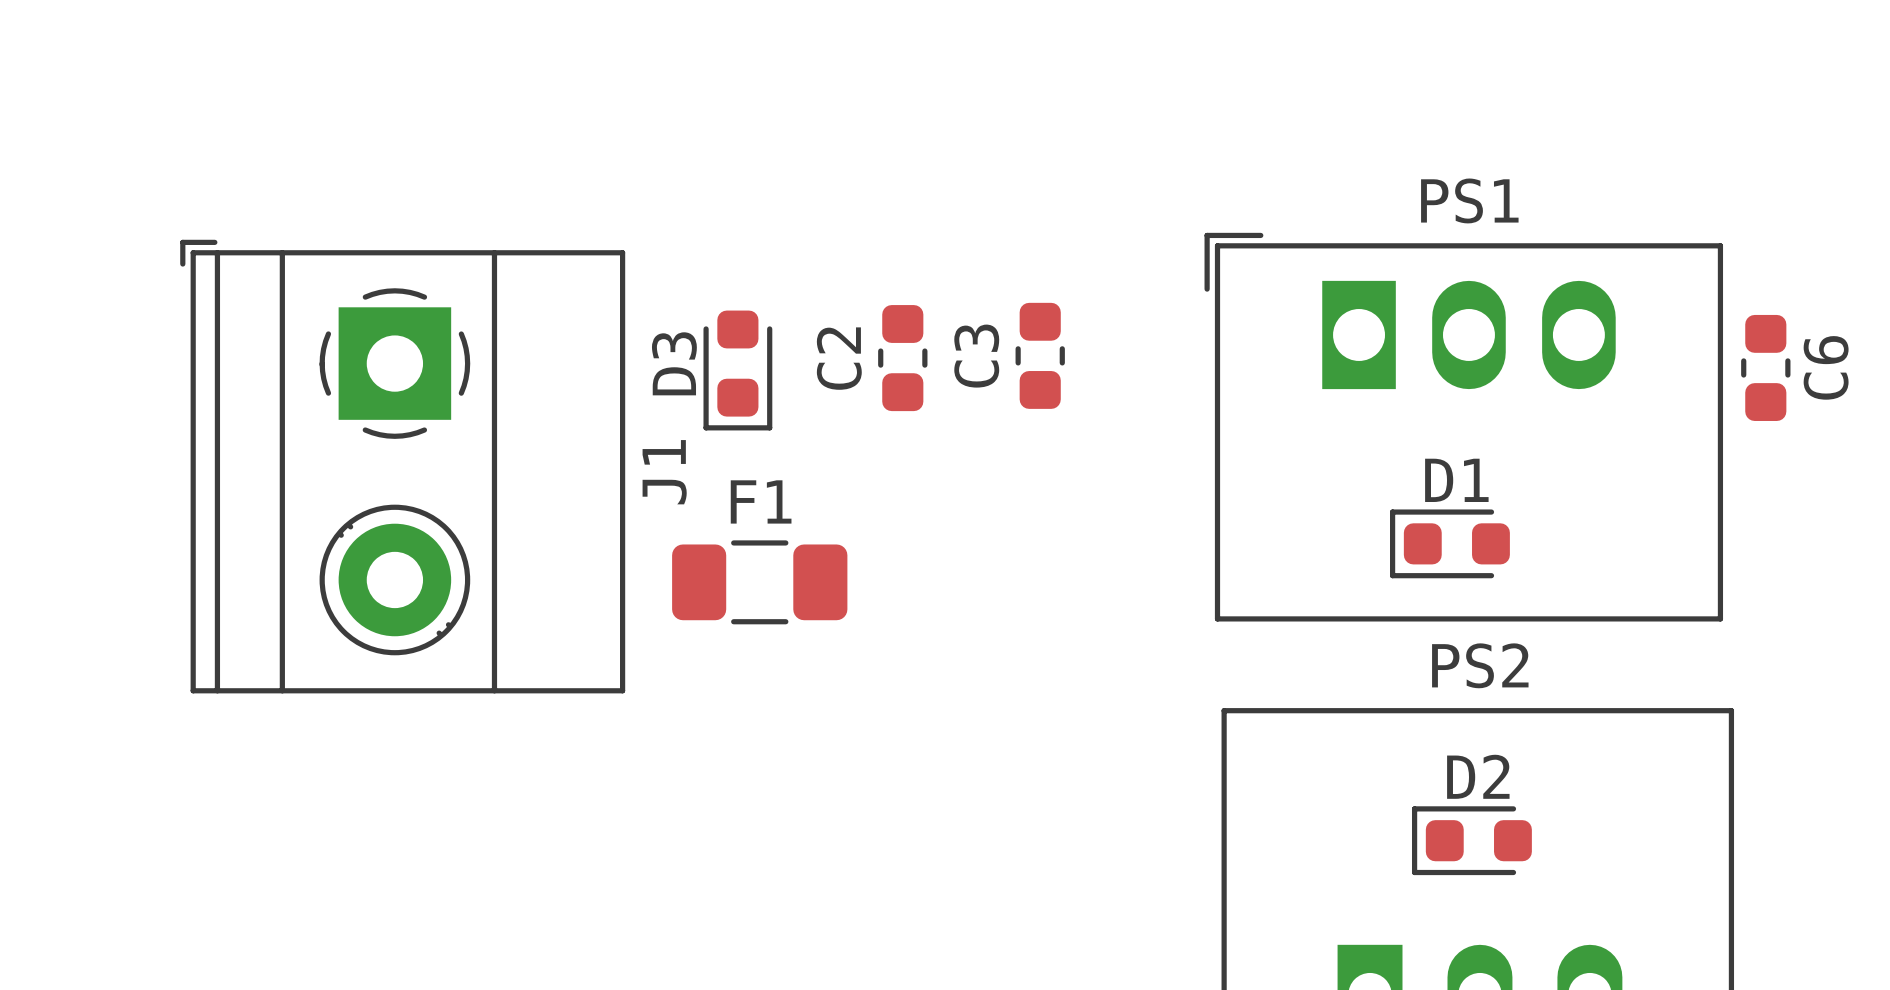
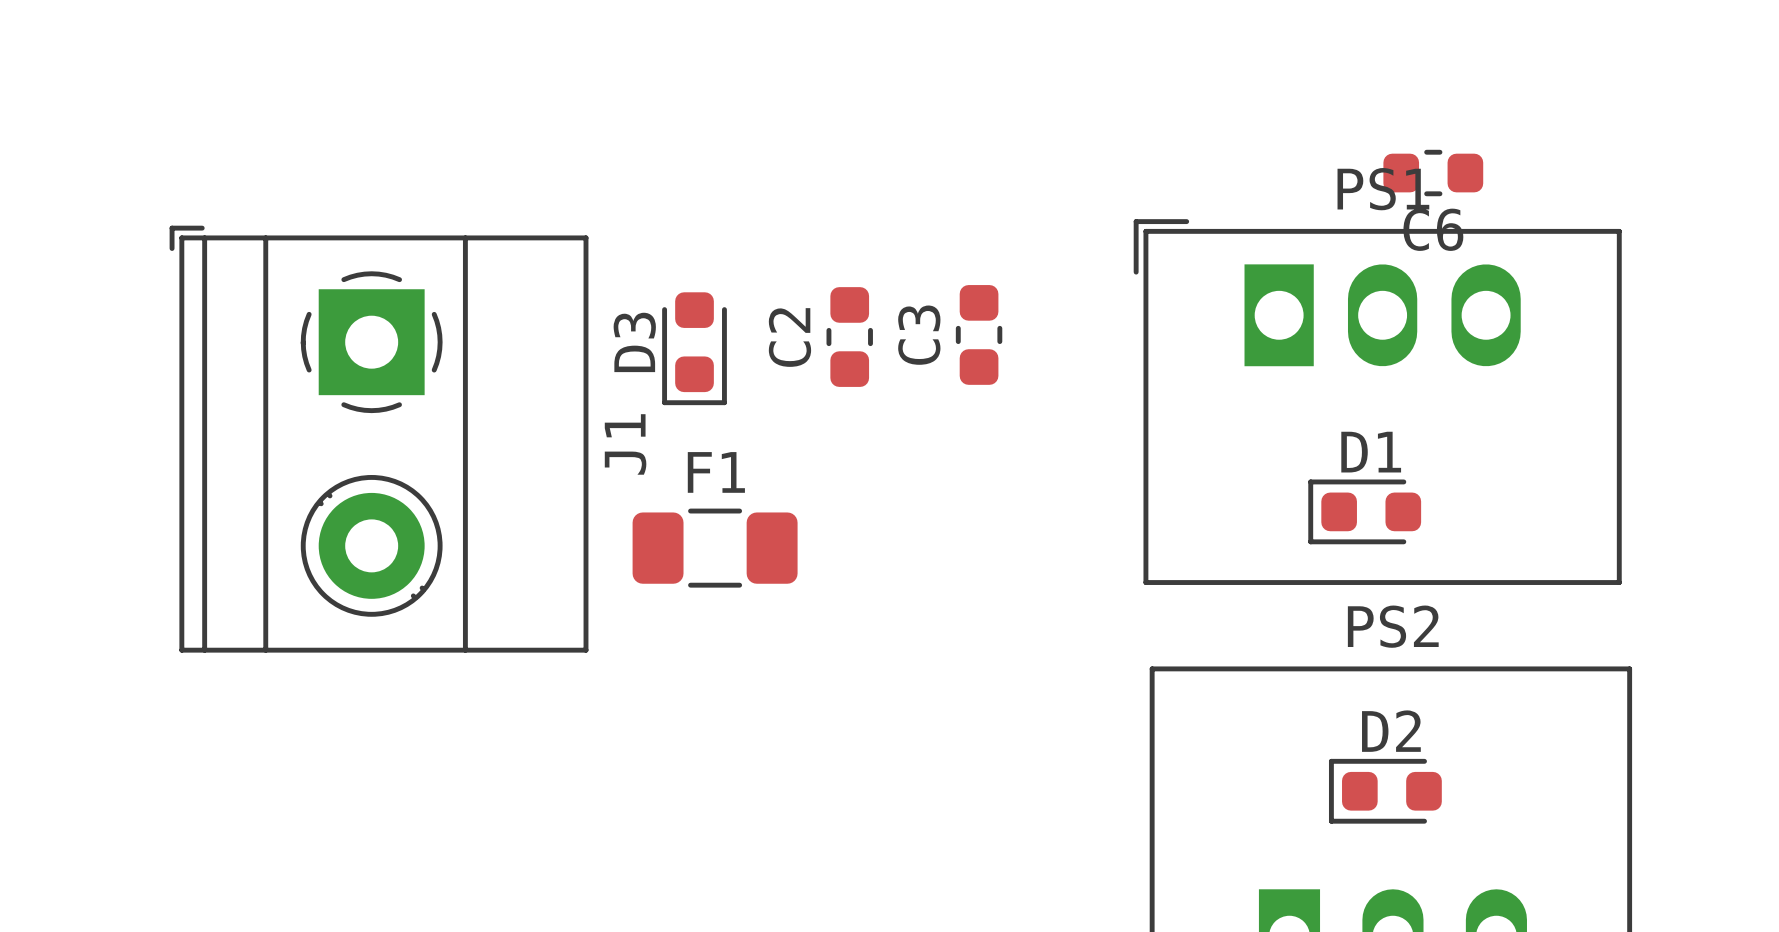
C6 rotation: 0° (1765, 367) -> 90° clockwise (1433, 173)
C6 position: (1765, 367) -> (1433, 173)

